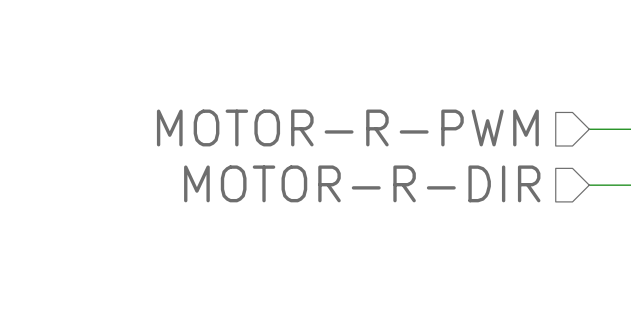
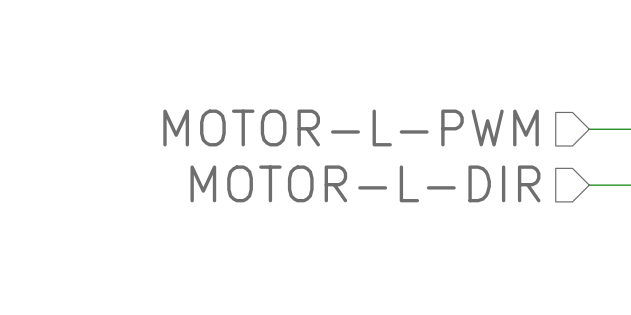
hierarchical label: MOTOR-R-PWM (347, 127) -> MOTOR-L-PWM (351, 127)
hierarchical label: MOTOR-R-DIR (362, 183) -> MOTOR-L-DIR (365, 183)

